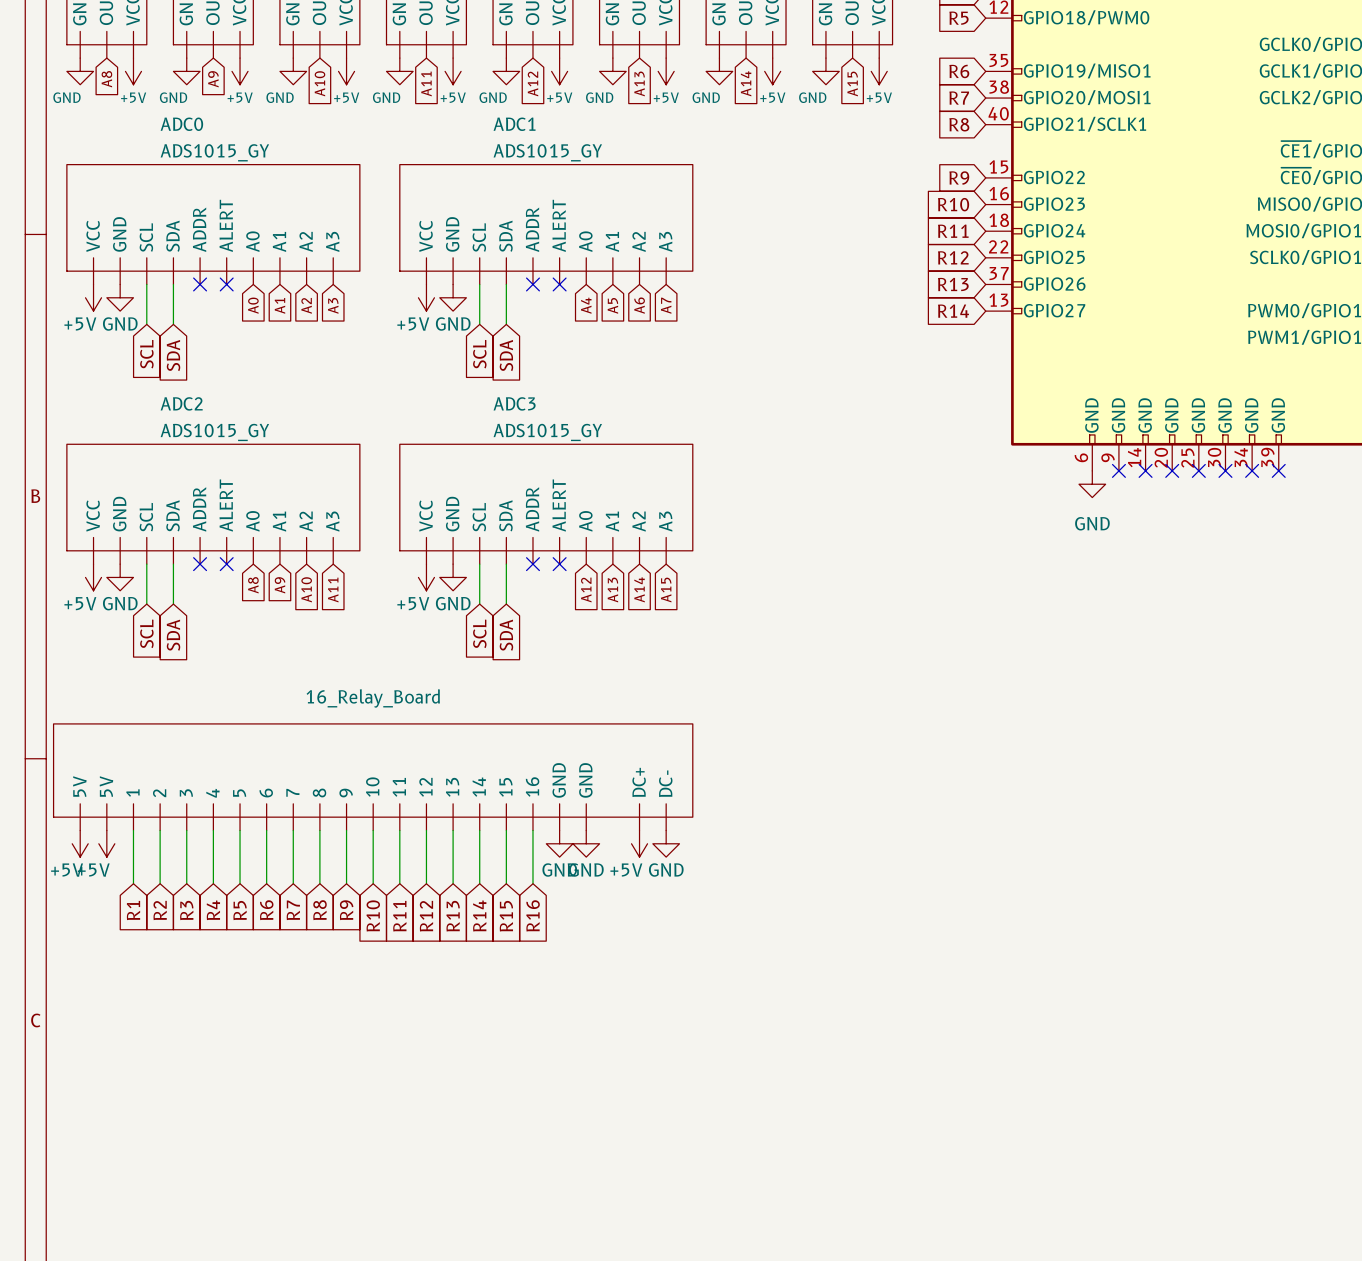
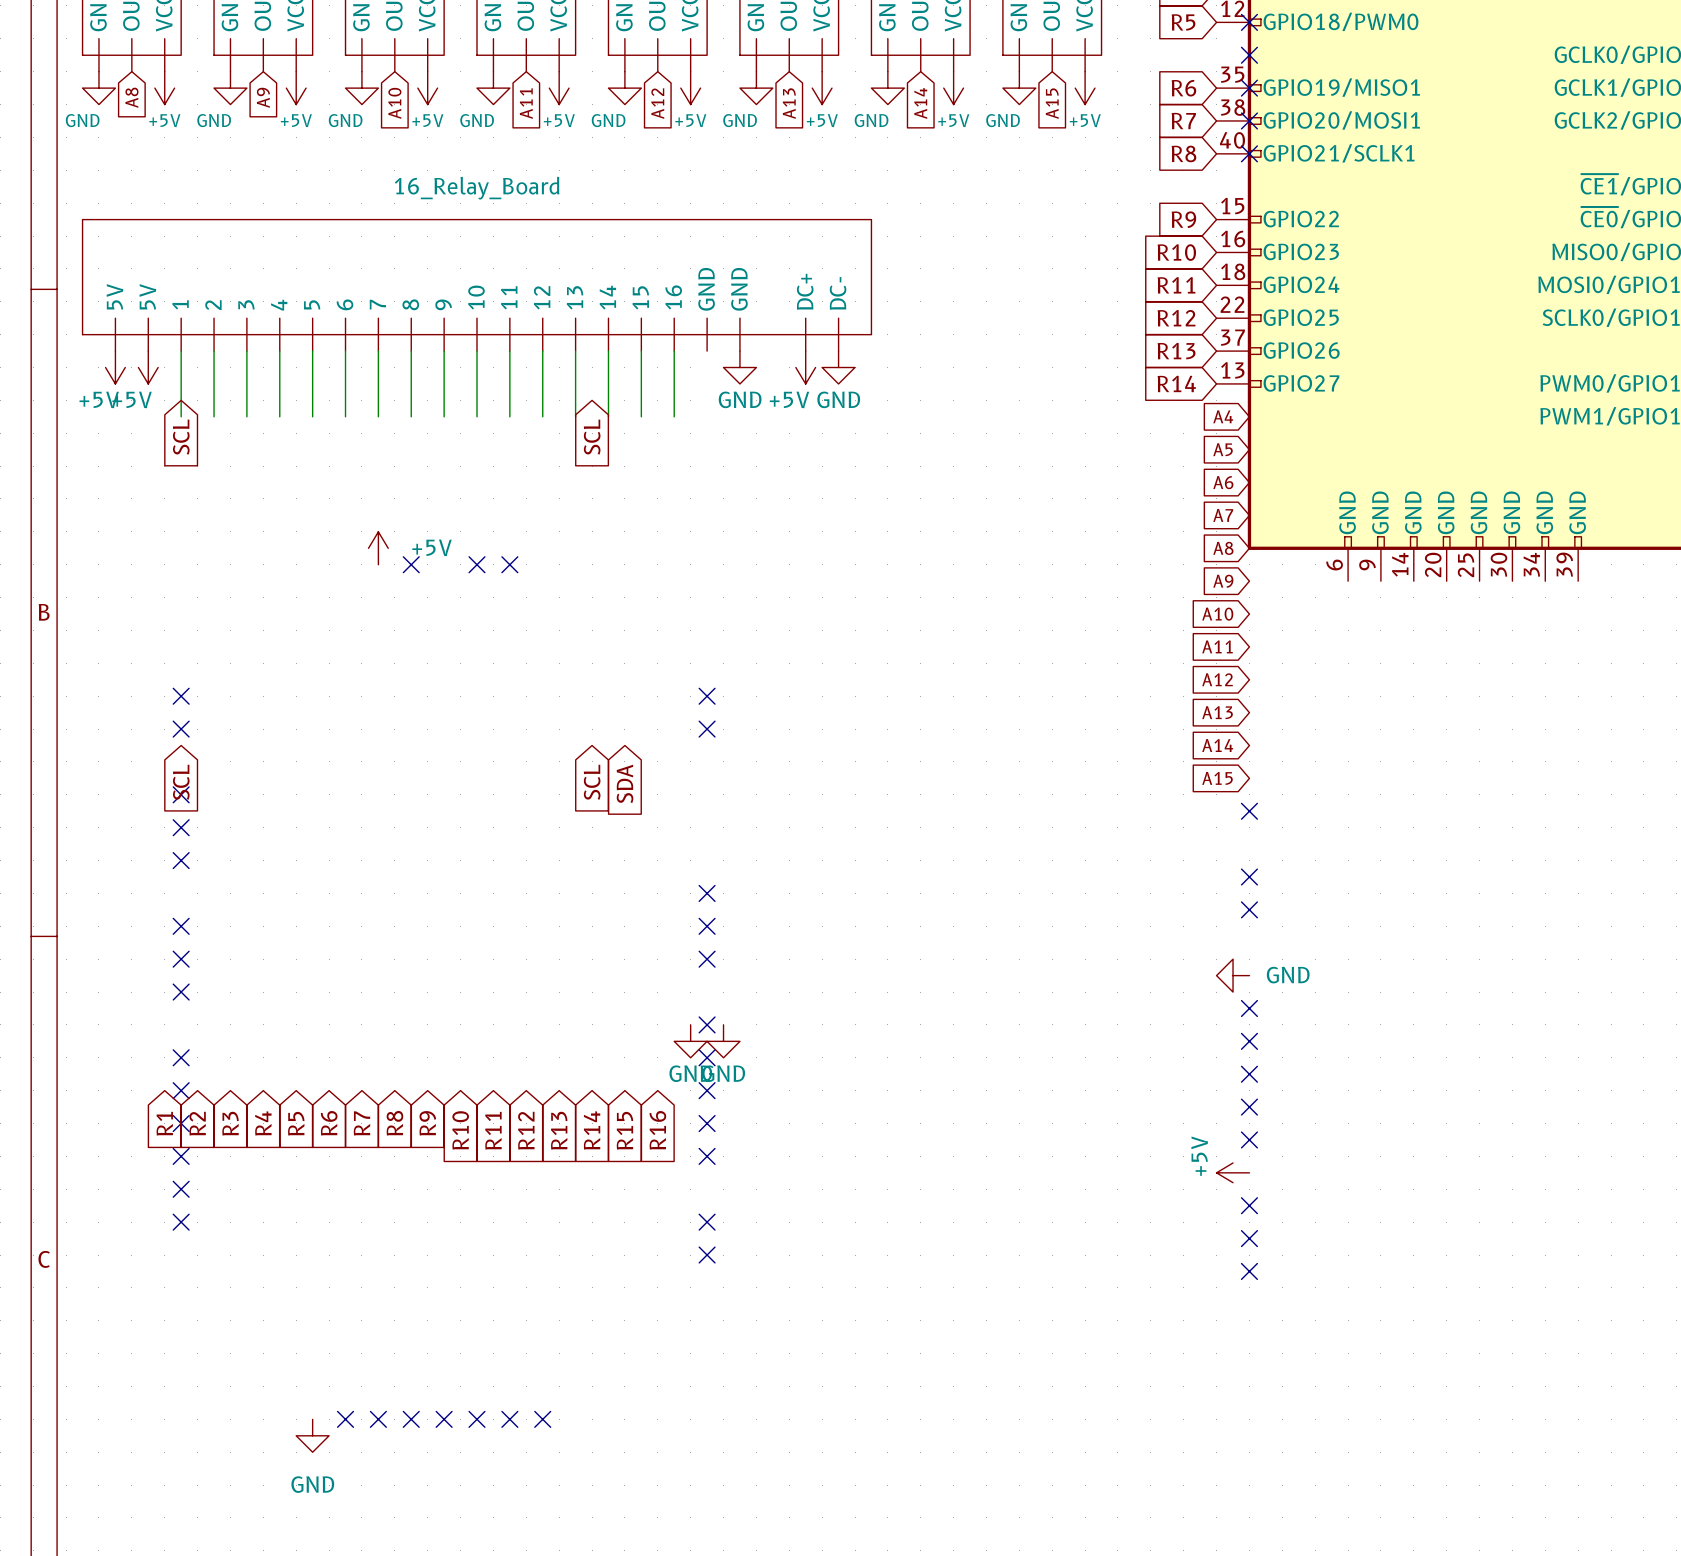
no-connect mark: none -> (1249, 22)
no-connect mark: none -> (1249, 55)
no-connect mark: none -> (1249, 88)
no-connect mark: none -> (1249, 120)
no-connect mark: none -> (1249, 153)
ADC0: ADS1015_GY (213, 224) -> none
ADC1: ADS1015_GY (546, 224) -> none
part: none -> 16_Relay_Board (476, 285)
wire: none -> (246, 351) (246, 416)
no-connect mark: (200, 284) -> none
wire: none -> (279, 351) (279, 416)
no-connect mark: (226, 284) -> none
wire: none -> (312, 351) (312, 416)
wire: none -> (345, 351) (345, 416)
wire: none -> (378, 351) (378, 416)
wire: none -> (411, 351) (411, 416)
wire: none -> (444, 351) (444, 416)
wire: none -> (476, 351) (476, 416)
wire: none -> (509, 351) (509, 416)
wire: none -> (542, 351) (542, 416)
wire: none -> (575, 351) (575, 416)
wire: (479, 284) (479, 324) -> none
wire: none -> (608, 351) (608, 416)
wire: (506, 284) (506, 324) -> none
wire: none -> (641, 351) (641, 416)
no-connect mark: (532, 284) -> none
wire: none -> (674, 351) (674, 416)
no-connect mark: (559, 284) -> none
power symbol: GND (120, 297) -> +5V (148, 367)
power symbol: +5V (426, 297) -> none
power symbol: GND (453, 297) -> none
power symbol: none -> GND (739, 367)
power symbol: none -> +5V (805, 367)
power symbol: none -> GND (838, 367)
global label: A0 (253, 305) -> none
global label: A1 (279, 305) -> none
global label: A2 (306, 305) -> none
global label: A3 (333, 305) -> none
global label: A4 (586, 305) -> none
global label: A5 (612, 305) -> none
global label: A6 (639, 305) -> none
global label: A7 (666, 305) -> none
wire: none -> (181, 400) (181, 416)
wire: none -> (214, 400) (214, 416)
global label: none -> A4 (1223, 416)
global label: SDA (173, 355) -> none
global label: SDA (506, 355) -> none
global label: none -> A5 (1223, 449)
global label: none -> A6 (1223, 482)
global label: none -> A7 (1223, 515)
power symbol: none -> +5V (378, 548)
global label: none -> A8 (1223, 548)
no-connect mark: none -> (411, 564)
no-connect mark: none -> (476, 564)
no-connect mark: none -> (509, 564)
global label: none -> A9 (1223, 581)
no-connect mark: (1118, 470) -> none
no-connect mark: (1145, 470) -> none
no-connect mark: (1172, 470) -> none
no-connect mark: (1198, 470) -> none
no-connect mark: (1225, 470) -> none
no-connect mark: (1252, 470) -> none
no-connect mark: (1278, 470) -> none
power symbol: GND (1092, 484) -> none
global label: none -> A10 (1217, 614)
ADC2: ADS1015_GY (213, 504) -> none
ADC3: ADS1015_GY (546, 504) -> none
global label: none -> A11 (1217, 646)
global label: none -> A12 (1217, 679)
wire: (146, 564) (146, 604) -> none
no-connect mark: none -> (181, 696)
wire: (173, 564) (173, 604) -> none
no-connect mark: (200, 564) -> none
no-connect mark: (226, 564) -> none
wire: (479, 564) (479, 604) -> none
wire: (506, 564) (506, 604) -> none
no-connect mark: (532, 564) -> none
no-connect mark position: (559, 564) -> (707, 696)
power symbol: +5V (93, 577) -> none
power symbol: GND (120, 577) -> none
power symbol: +5V (426, 577) -> none
power symbol: GND (453, 577) -> none
global label: none -> A13 (1217, 712)
global label: A8 (253, 585) -> none
global label: A9 (280, 585) -> none
global label: A10 (306, 589) -> none
global label: A14 (639, 589) -> none
no-connect mark: none -> (181, 729)
global label: A11 (333, 590) -> none
no-connect mark: none -> (707, 729)
global label: A12 (586, 590) -> none
global label: A13 (612, 590) -> none
global label: A15 (666, 590) -> none
global label: none -> A14 (1217, 745)
global label: none -> A15 (1217, 778)
global label: SDA (173, 635) -> none
no-connect mark: none -> (181, 794)
no-connect mark: none -> (1249, 811)
no-connect mark: none -> (181, 827)
no-connect mark: none -> (181, 860)
no-connect mark: none -> (1249, 877)
no-connect mark: none -> (707, 893)
no-connect mark: none -> (1249, 909)
no-connect mark: none -> (181, 926)
no-connect mark: none -> (707, 926)
no-connect mark: none -> (181, 959)
part: 16_Relay_Board (373, 777) -> none
no-connect mark: none -> (707, 959)
power symbol: none -> GND (1233, 975)
no-connect mark: none -> (181, 992)
no-connect mark: none -> (1249, 1008)
wire: (133, 830) (133, 883) -> none
wire: (160, 830) (160, 883) -> none
wire: (186, 830) (186, 883) -> none
wire: (213, 830) (213, 883) -> none
wire: (240, 830) (240, 883) -> none
wire: (266, 830) (266, 883) -> none
wire: (293, 830) (293, 883) -> none
wire: (319, 830) (319, 883) -> none
wire: (346, 830) (346, 883) -> none
wire: (373, 830) (373, 883) -> none
wire: (399, 830) (399, 883) -> none
wire: (426, 830) (426, 883) -> none
wire: (453, 830) (453, 883) -> none
wire: (479, 830) (479, 883) -> none
wire: (506, 830) (506, 883) -> none
wire: (532, 830) (532, 883) -> none
no-connect mark: none -> (707, 1024)
power symbol: +5V (80, 843) -> none
power symbol: +5V (106, 843) -> none
power symbol: +5V (639, 843) -> none
power symbol: GND (666, 843) -> none
no-connect mark: none -> (1249, 1041)
no-connect mark: none -> (181, 1057)
no-connect mark: none -> (707, 1057)
no-connect mark: none -> (1249, 1074)
no-connect mark: none -> (181, 1090)
no-connect mark: none -> (707, 1090)
no-connect mark: none -> (1249, 1107)
no-connect mark: none -> (181, 1123)
no-connect mark: none -> (707, 1123)
no-connect mark: none -> (1249, 1139)
no-connect mark: none -> (181, 1156)
no-connect mark: none -> (707, 1156)
power symbol: none -> +5V (1233, 1172)
no-connect mark: none -> (181, 1189)
no-connect mark: none -> (1249, 1205)
no-connect mark: none -> (181, 1222)
no-connect mark: none -> (707, 1222)
no-connect mark: none -> (1249, 1238)
no-connect mark: none -> (707, 1255)
no-connect mark: none -> (1249, 1271)
no-connect mark: none -> (345, 1419)
no-connect mark: none -> (378, 1419)
no-connect mark: none -> (411, 1419)
no-connect mark: none -> (444, 1419)
no-connect mark: none -> (476, 1419)
no-connect mark: none -> (509, 1419)
no-connect mark: none -> (542, 1419)
power symbol: none -> GND (312, 1435)

